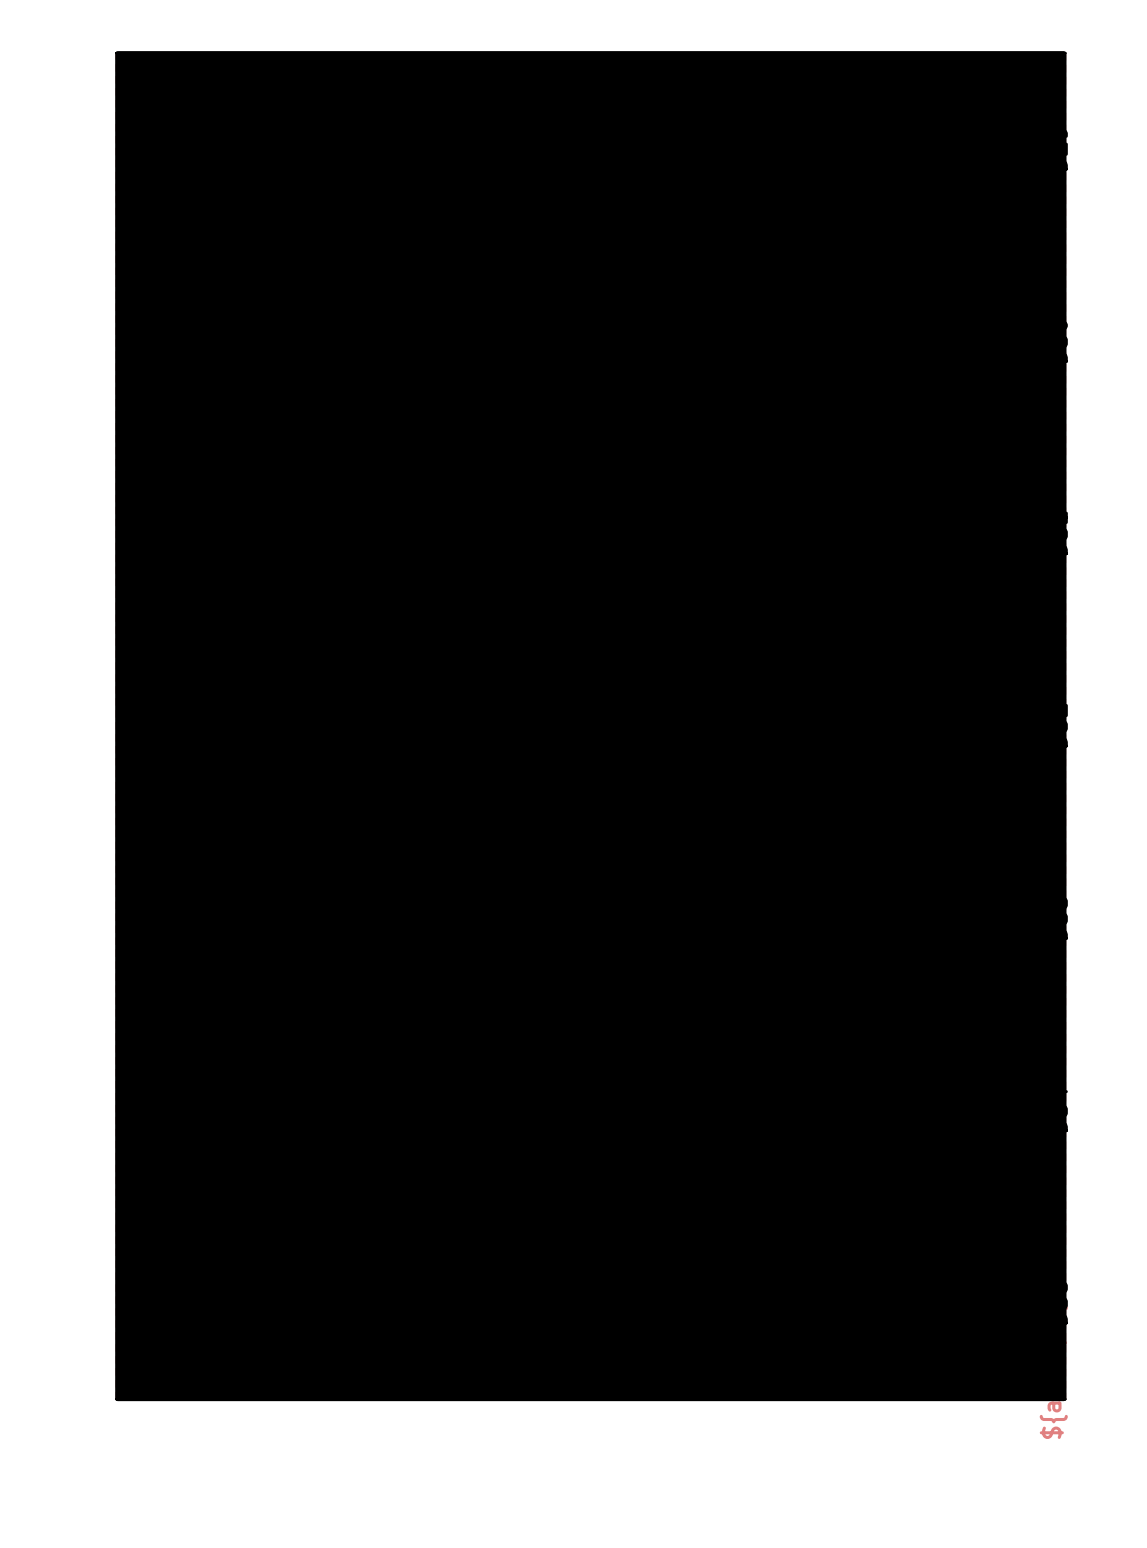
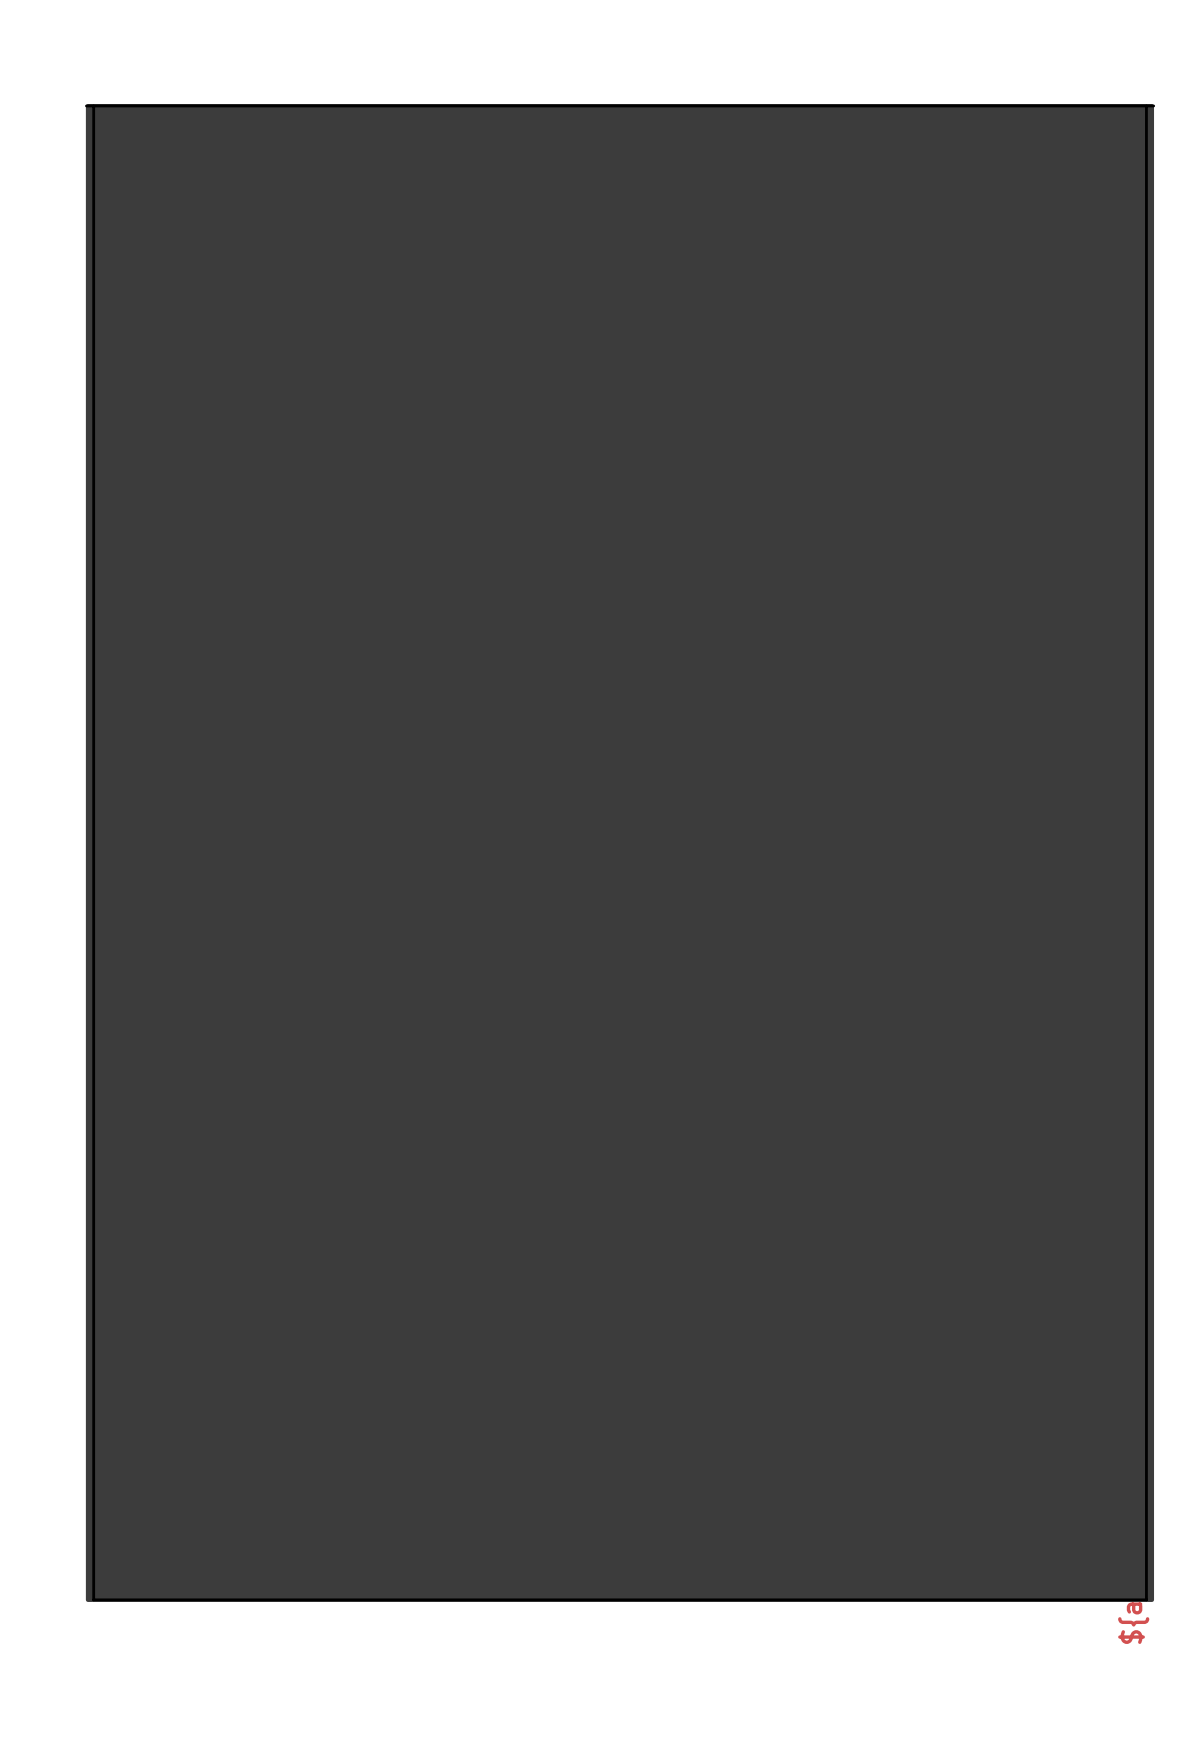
drawing shape: [115, 51, 1066, 1402] -> [85, 104, 1155, 1602]

